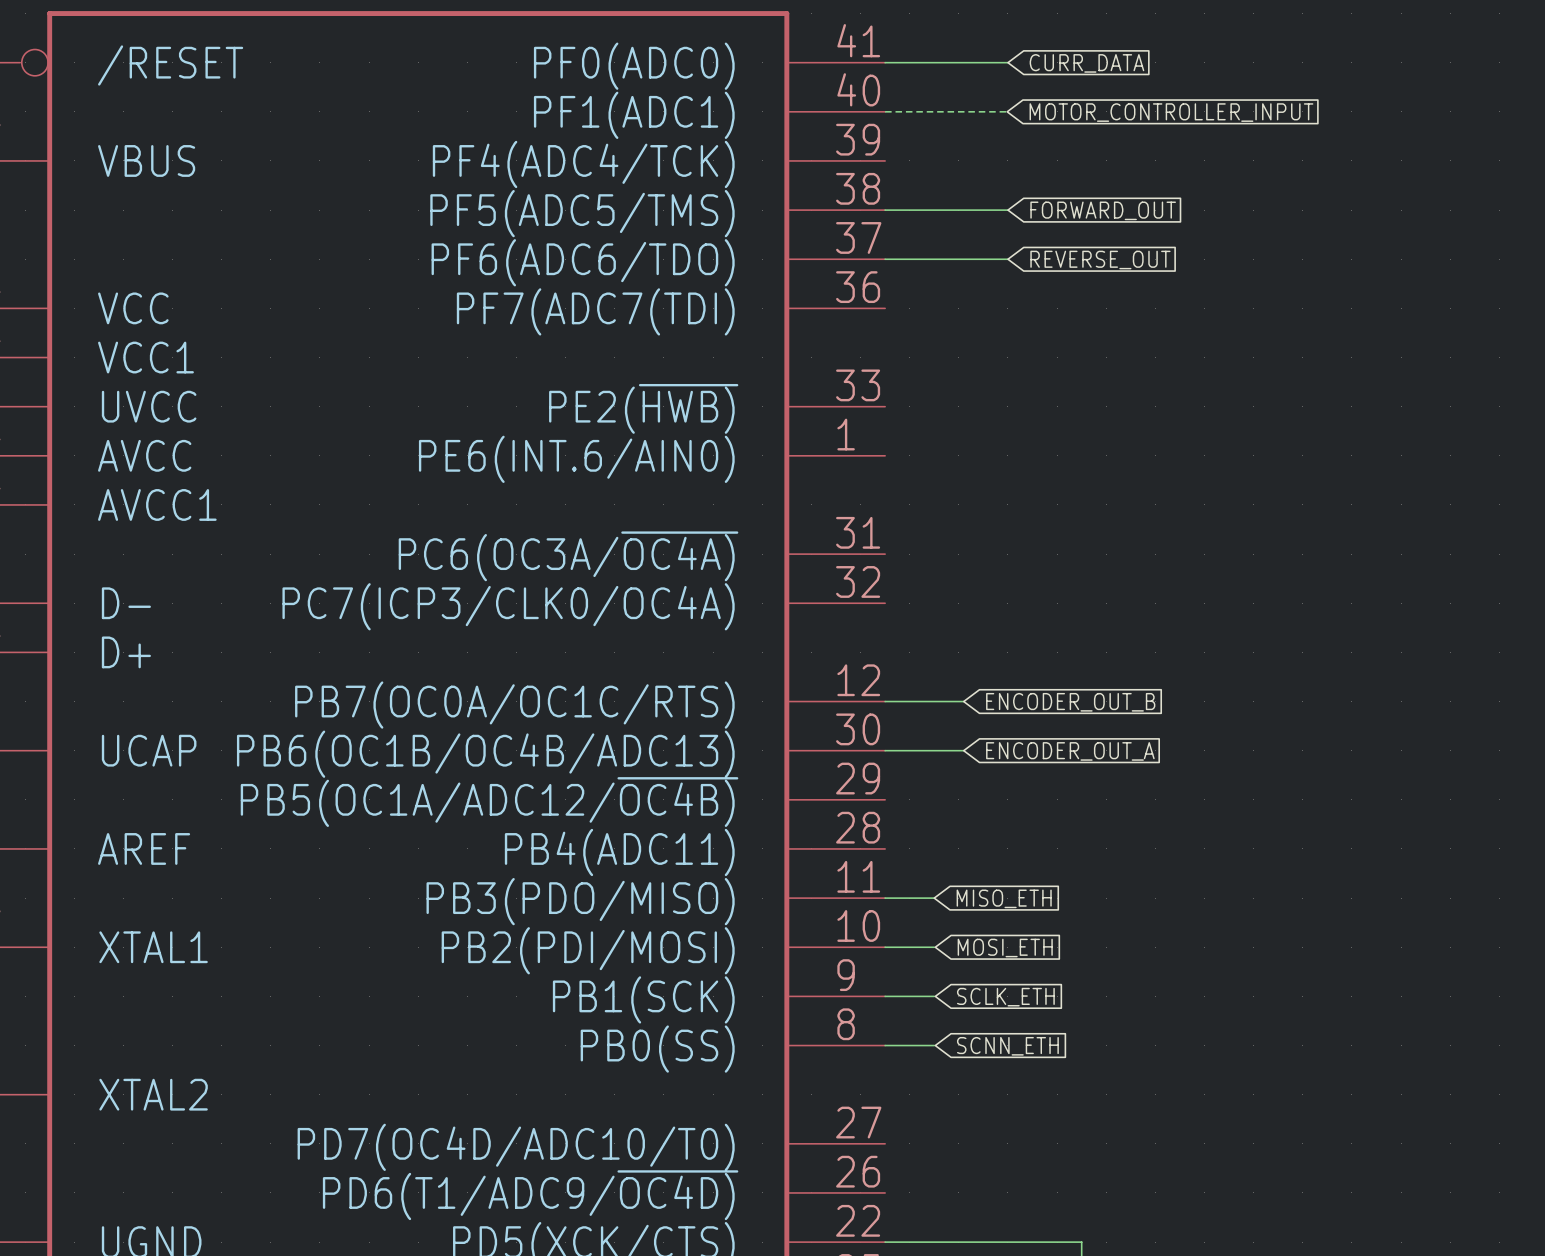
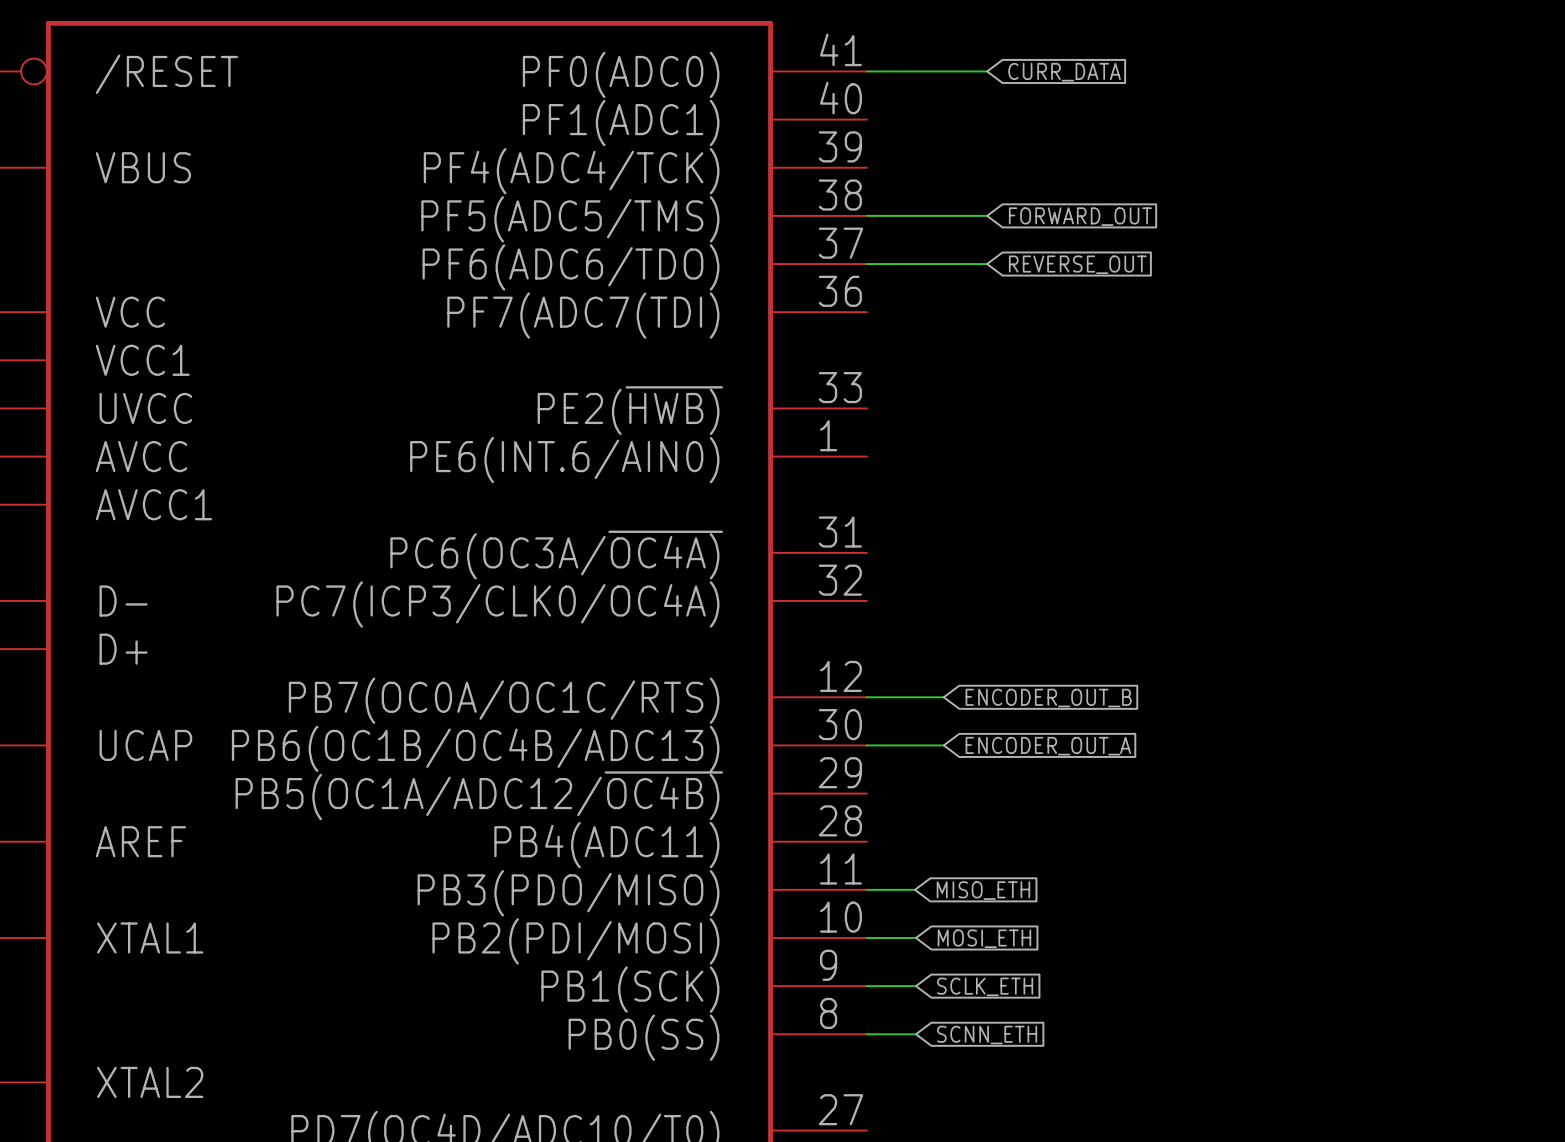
wire: (885, 111) (1007, 111) -> none
global label: MOTOR_CONTROLLER_INPUT (1171, 112) -> none

